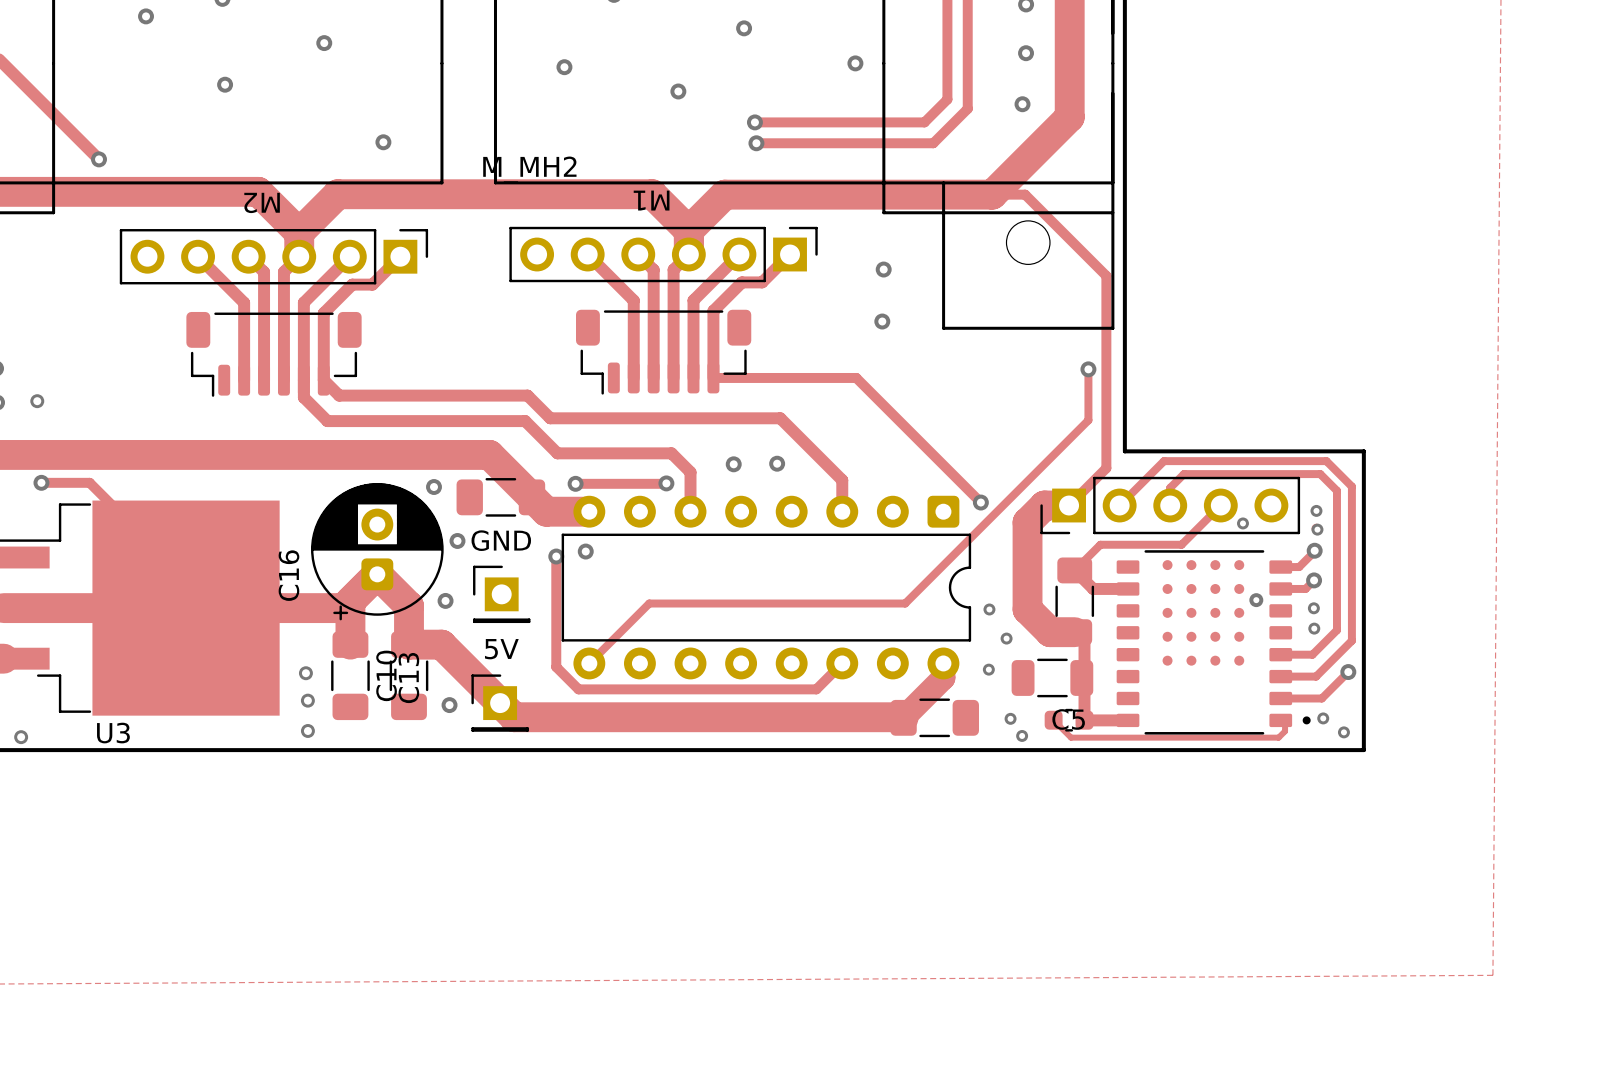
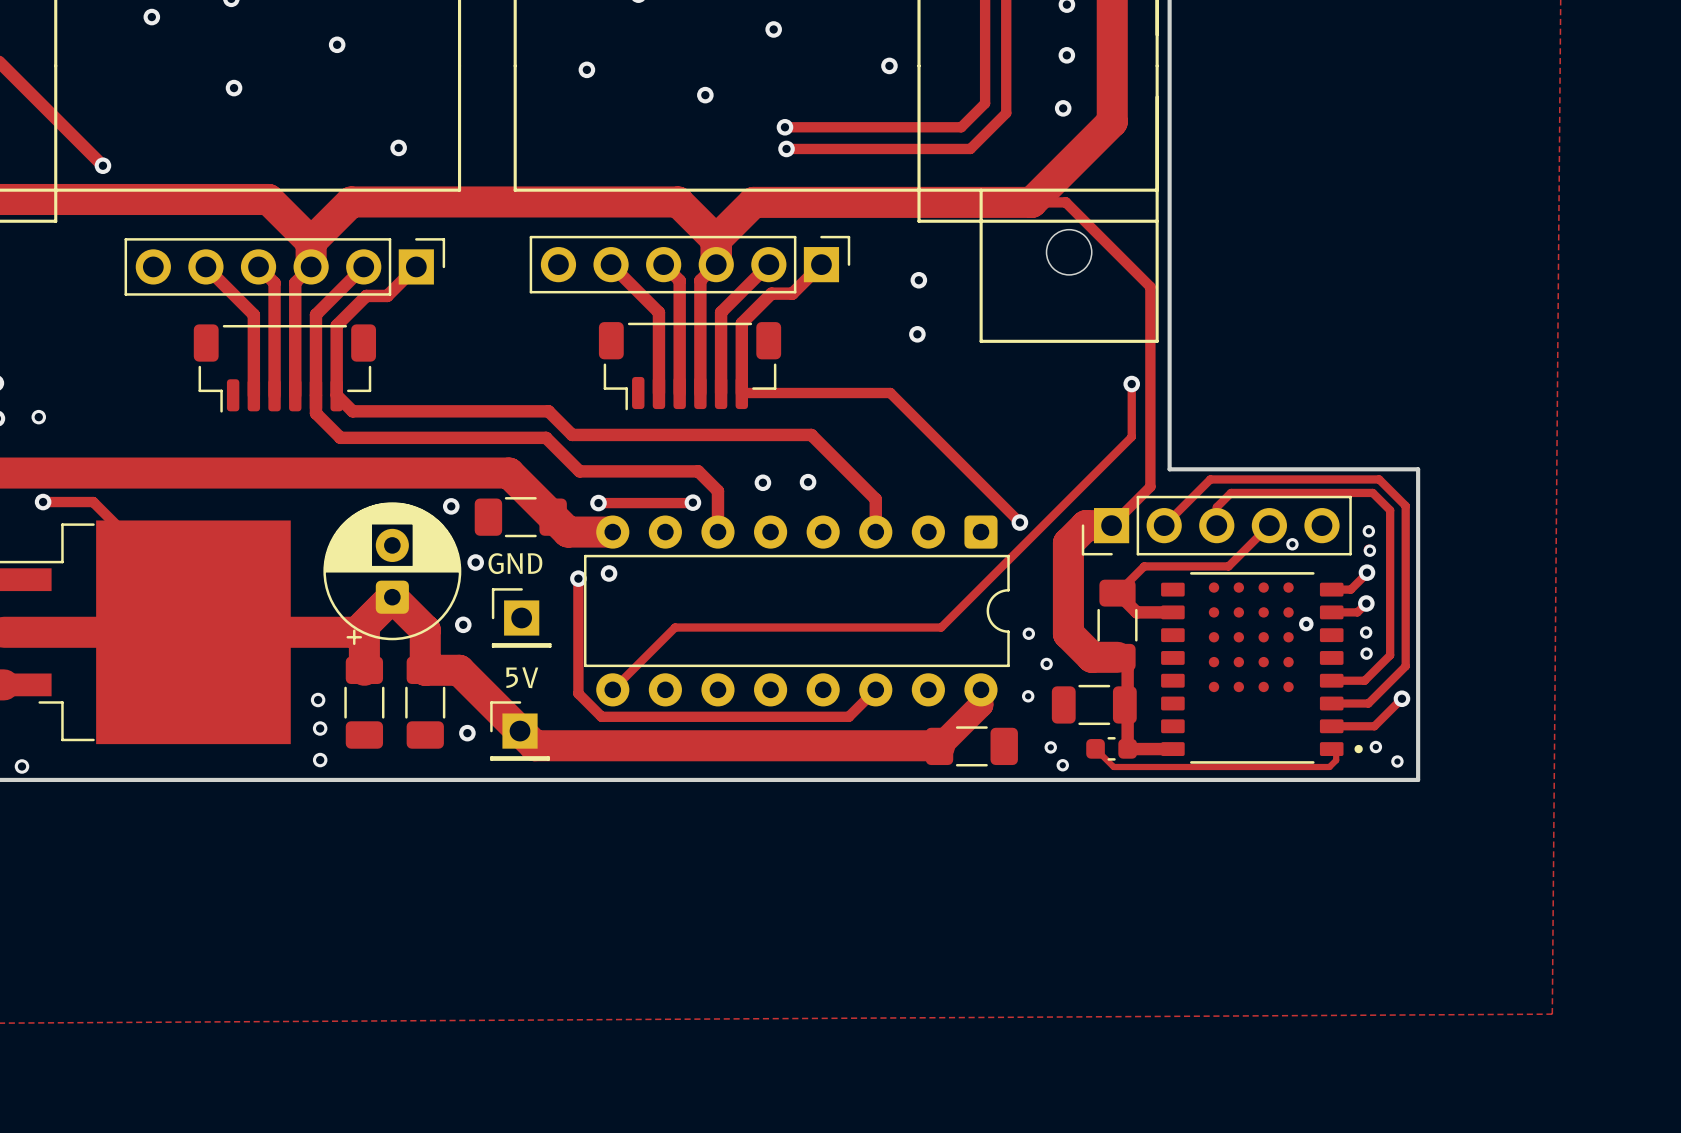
M_MH2 name: M_MH2 (529, 169) -> none
M1 name: M1 (651, 200) -> none
M2 name: M2 (262, 202) -> none
GND name: GND (501, 540) -> none
text: none -> GND (515, 563)
C16 name: C16 (288, 575) -> none
5V name: 5V (501, 649) -> none
text: none -> 5V (522, 677)
C10 name: C10 (386, 675) -> none
C13 name: C13 (408, 678) -> none
C5 name: C5 (1068, 719) -> none
U3 name: U3 (113, 733) -> none

